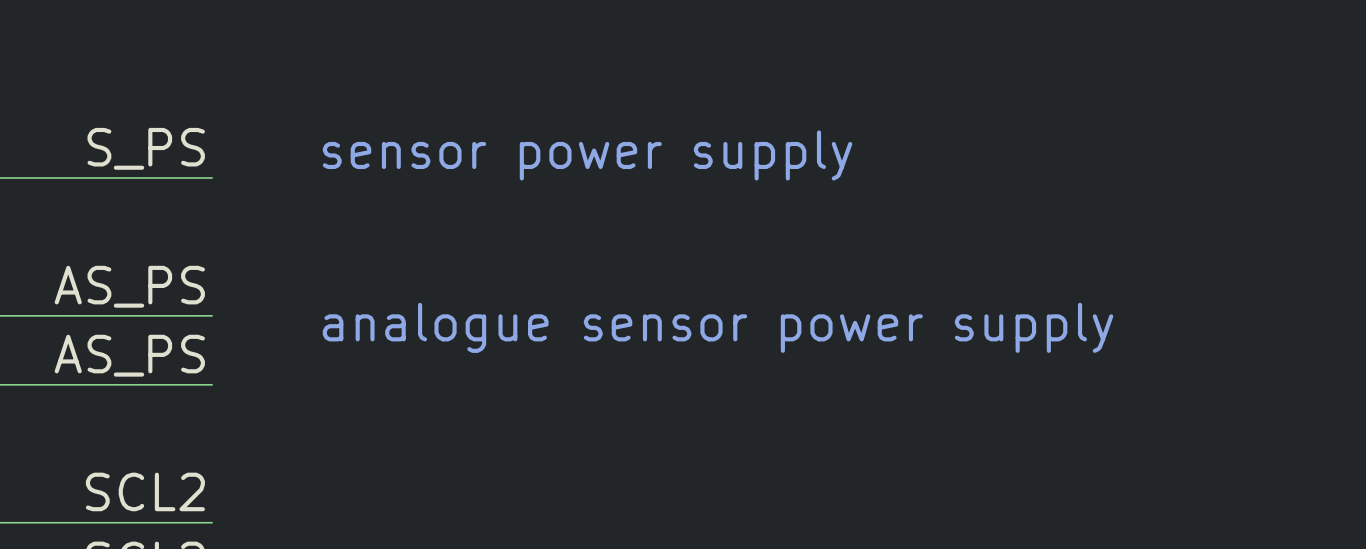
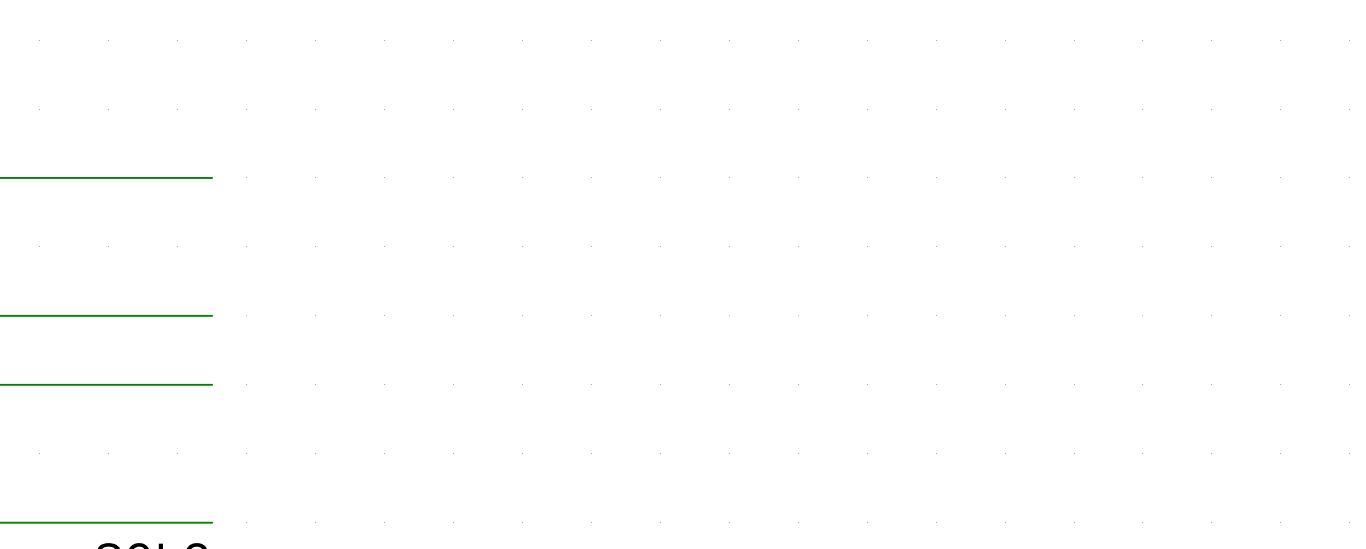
label: S_PS (146, 148) -> none
text: sensor power supply (587, 155) -> none
label: AS_PS (129, 286) -> none
text: analogue sensor power supply (718, 327) -> none
label: AS_PS (129, 355) -> none
label: SCL2 (145, 491) -> none

